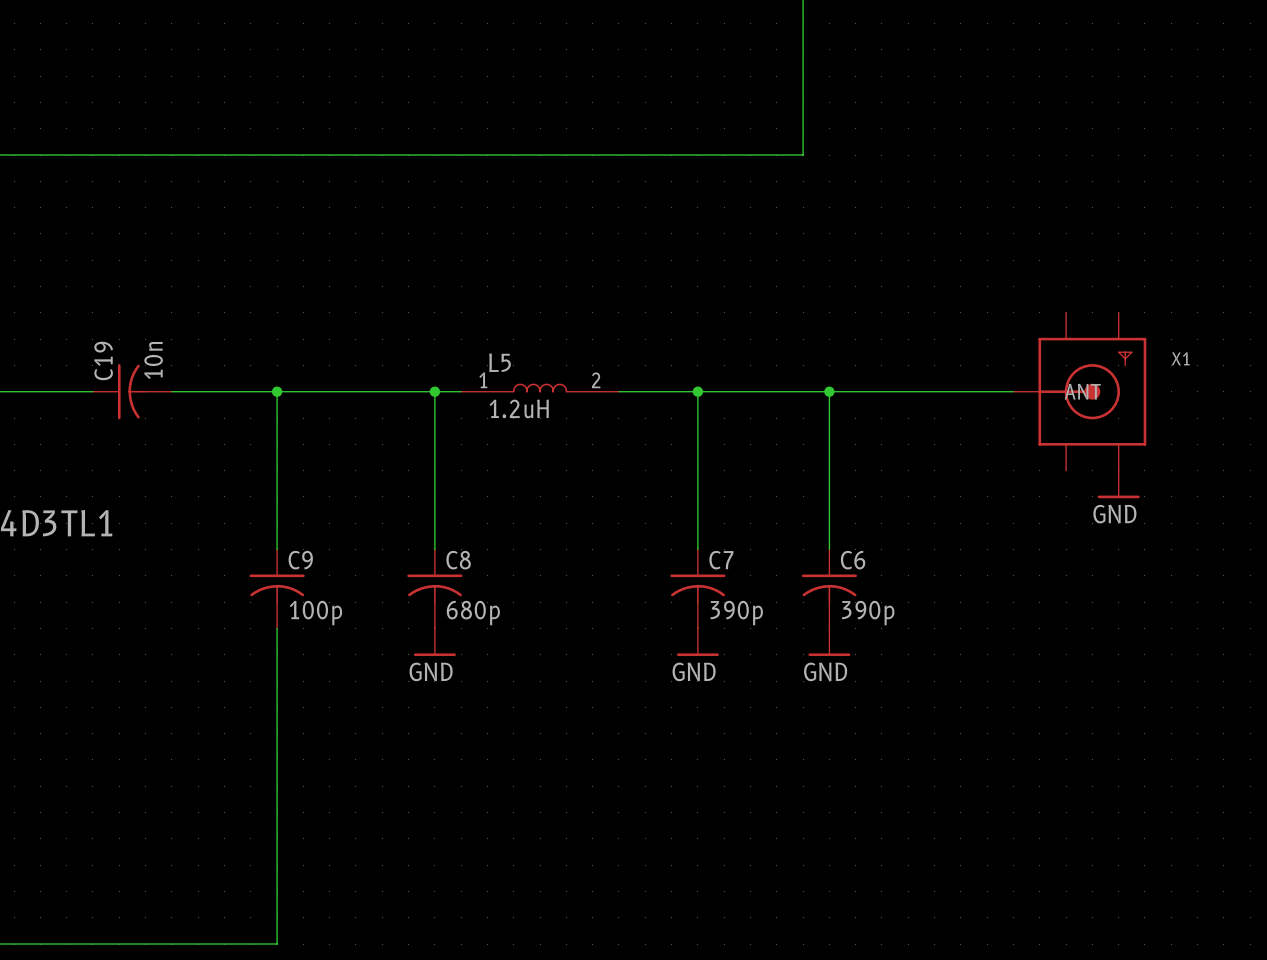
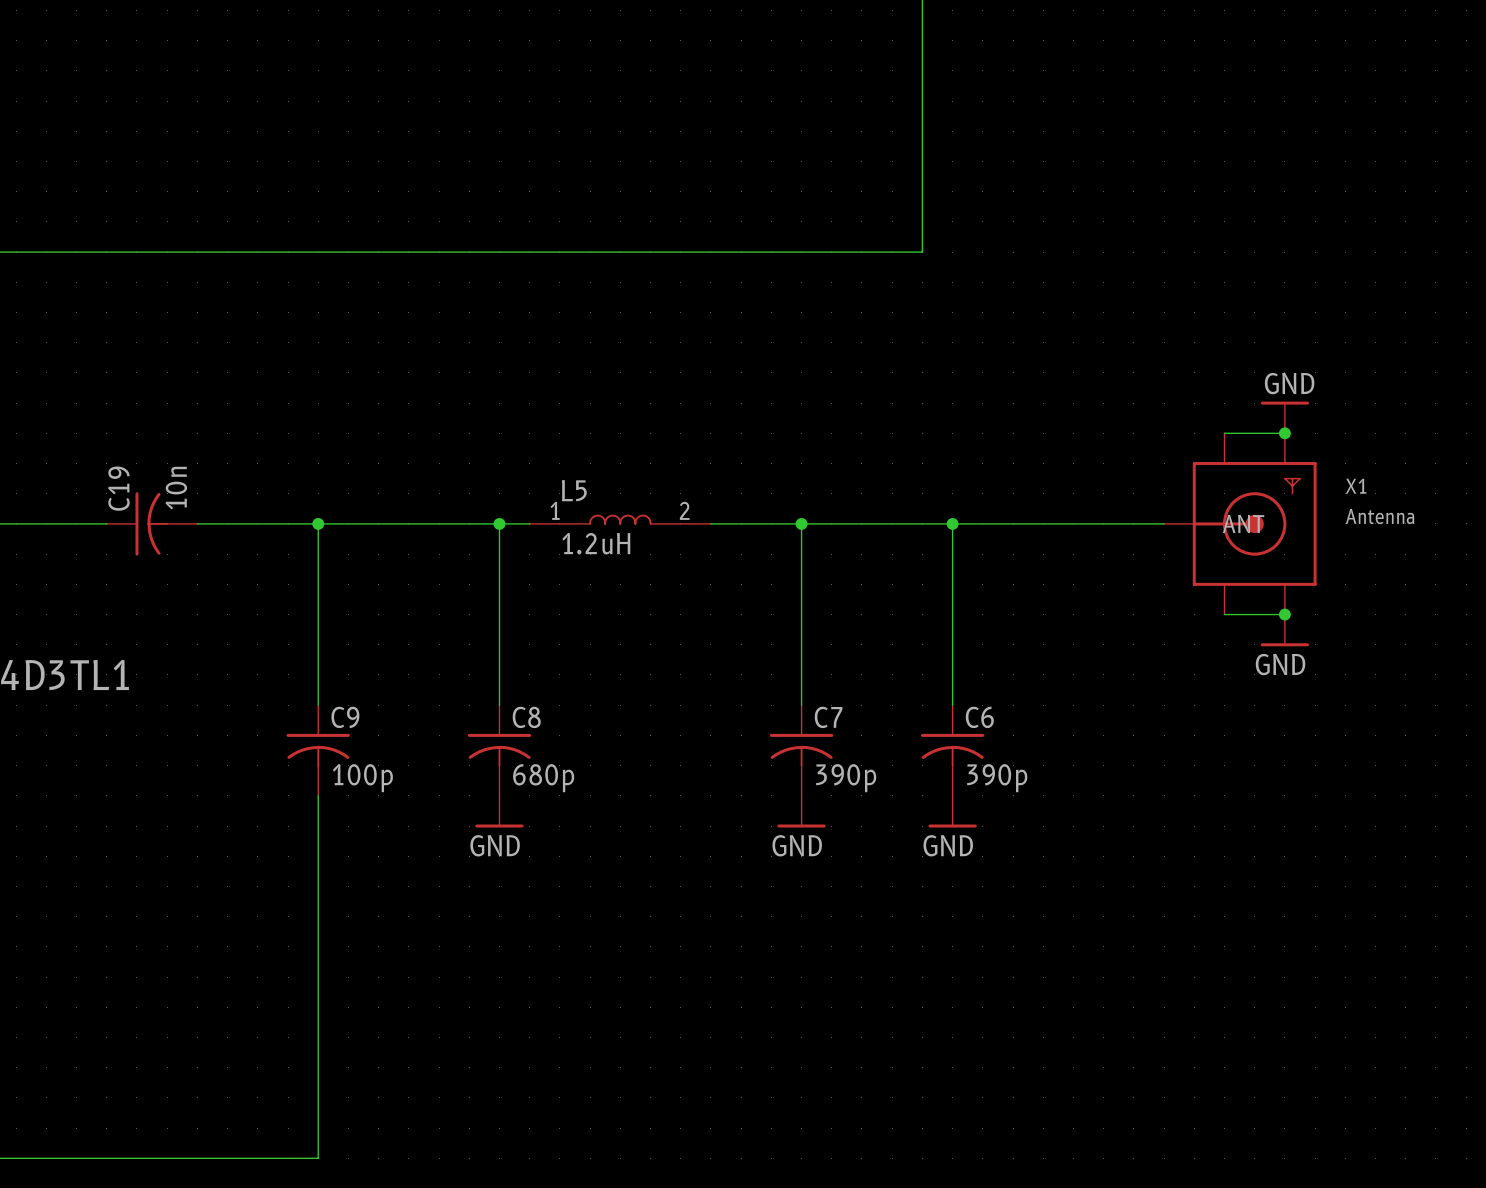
power symbol: none -> GND (1284, 417)
wire: none -> (1224, 433) (1284, 433)
junction: none -> (1284, 433)
X1 value: none -> Antenna (1380, 516)
wire: none -> (1224, 614) (1284, 614)
junction: none -> (1284, 614)

